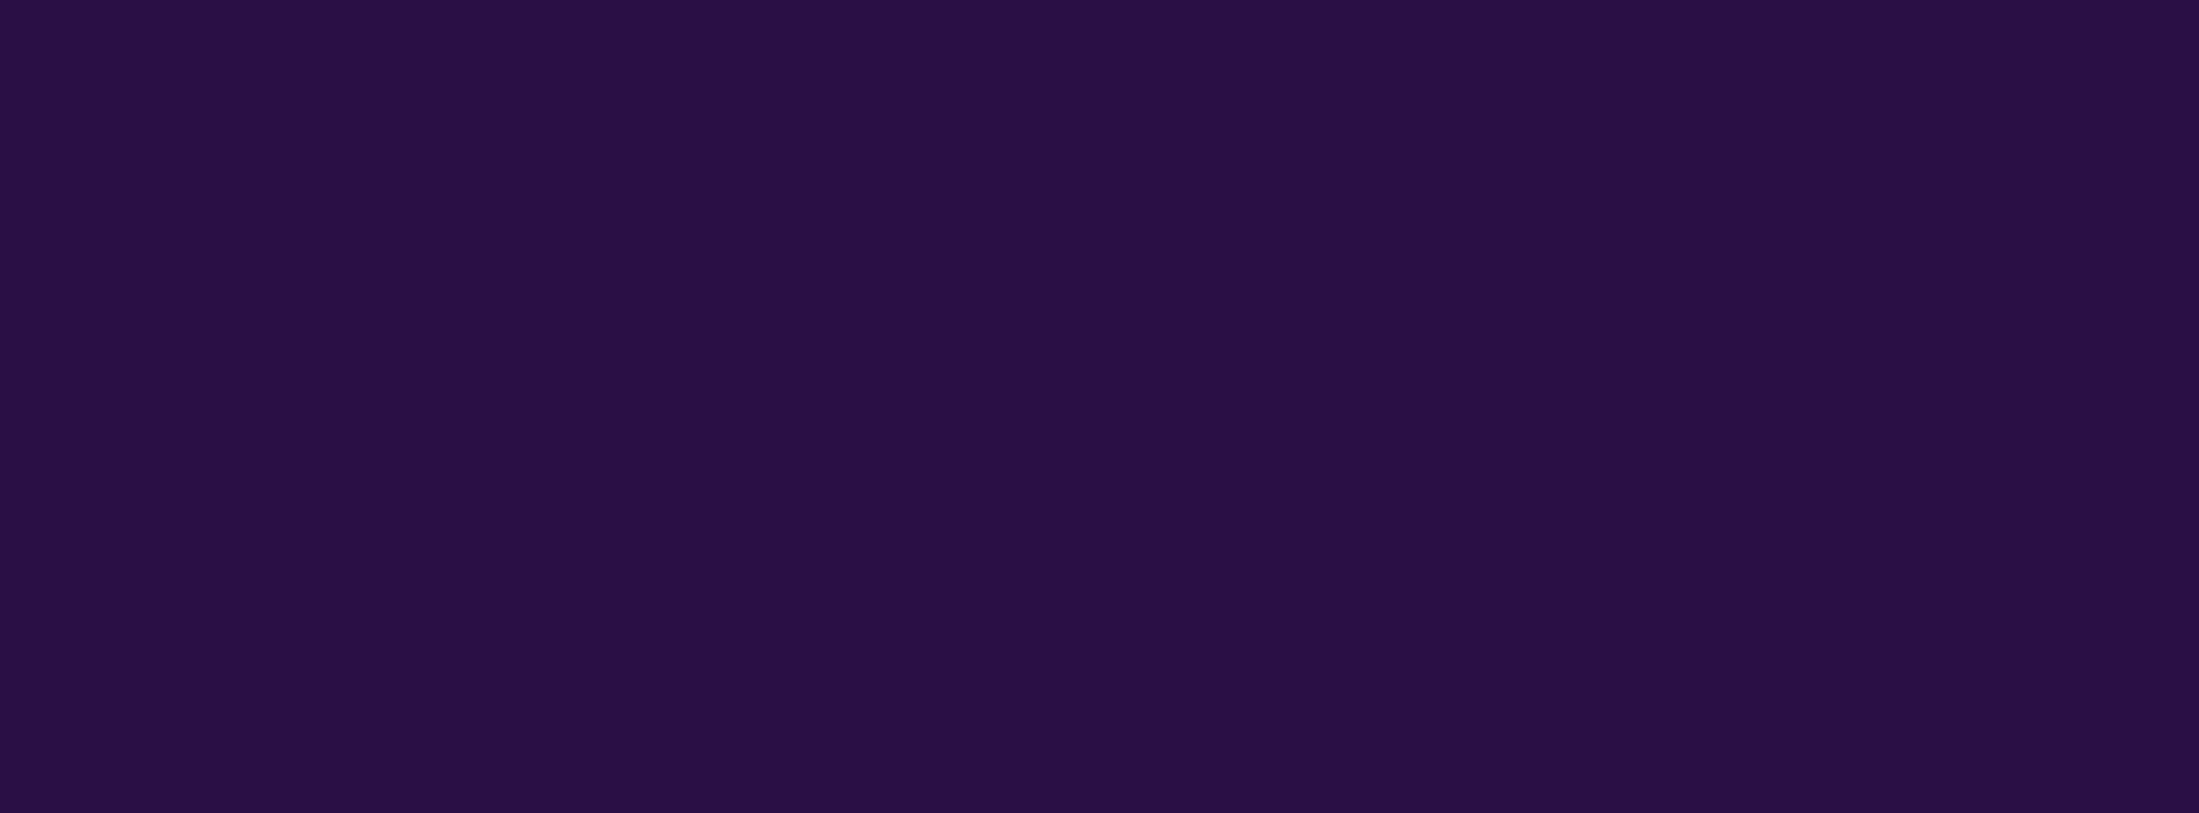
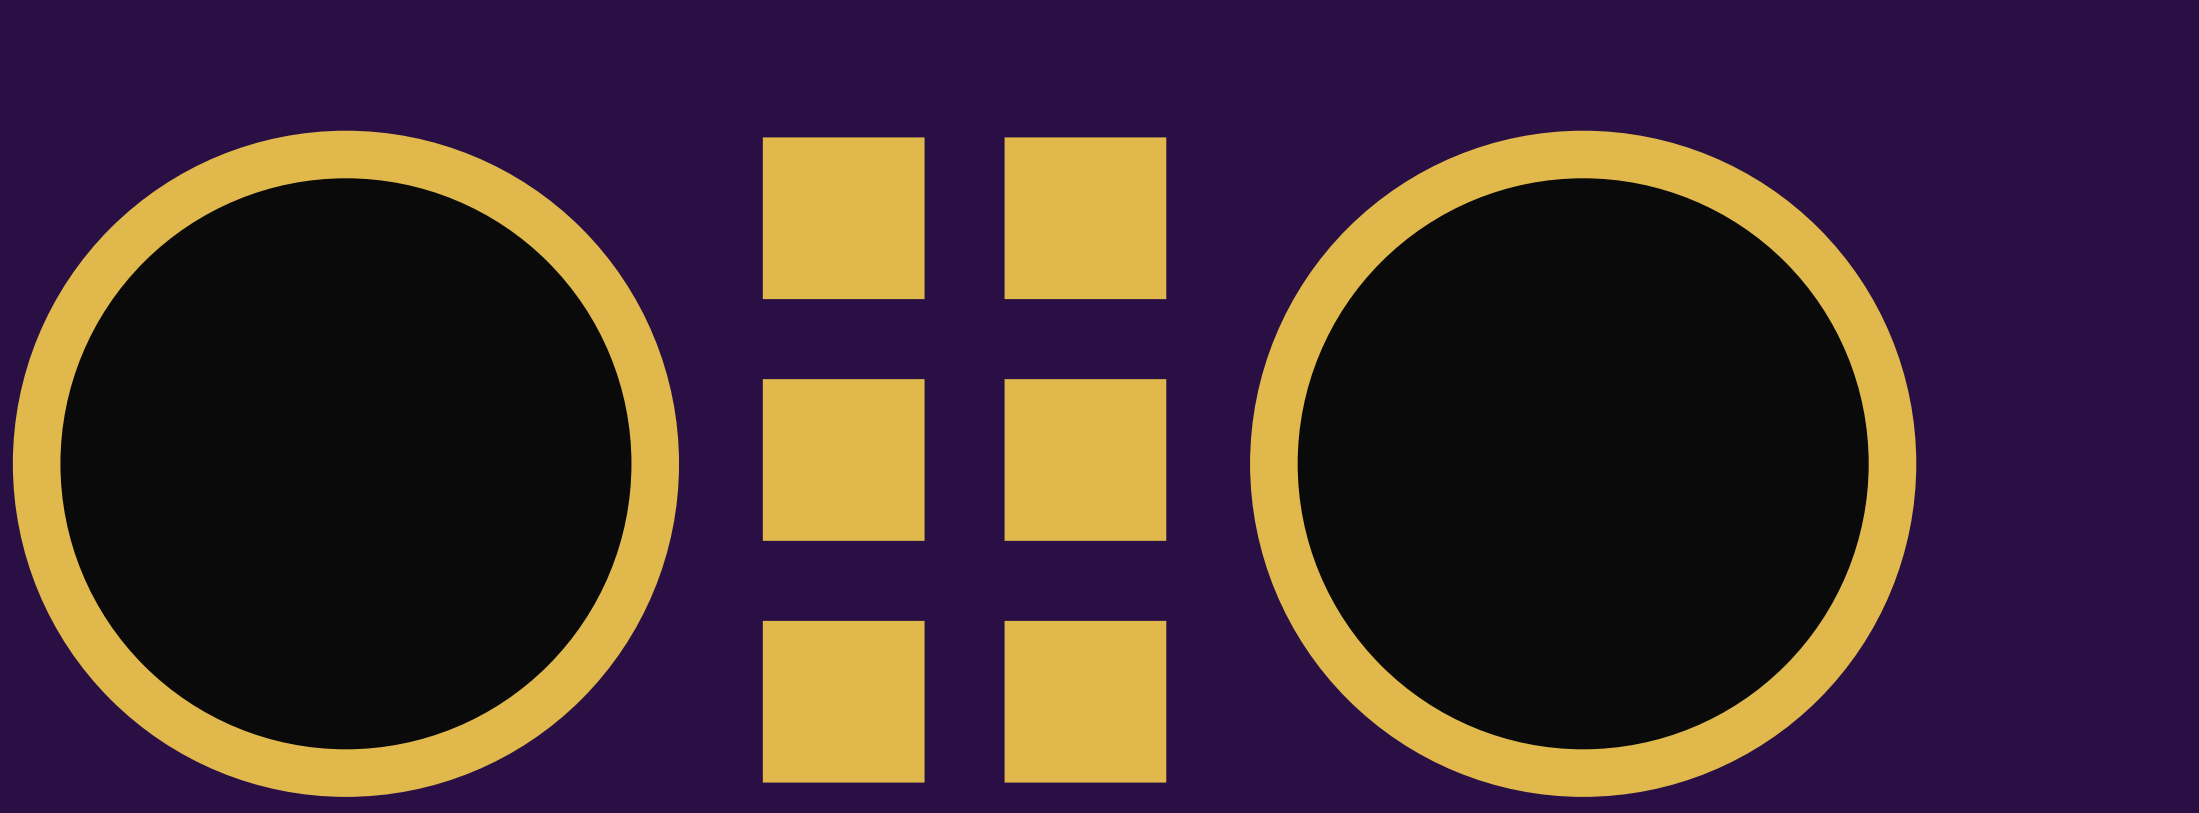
part: none -> (964, 463)

